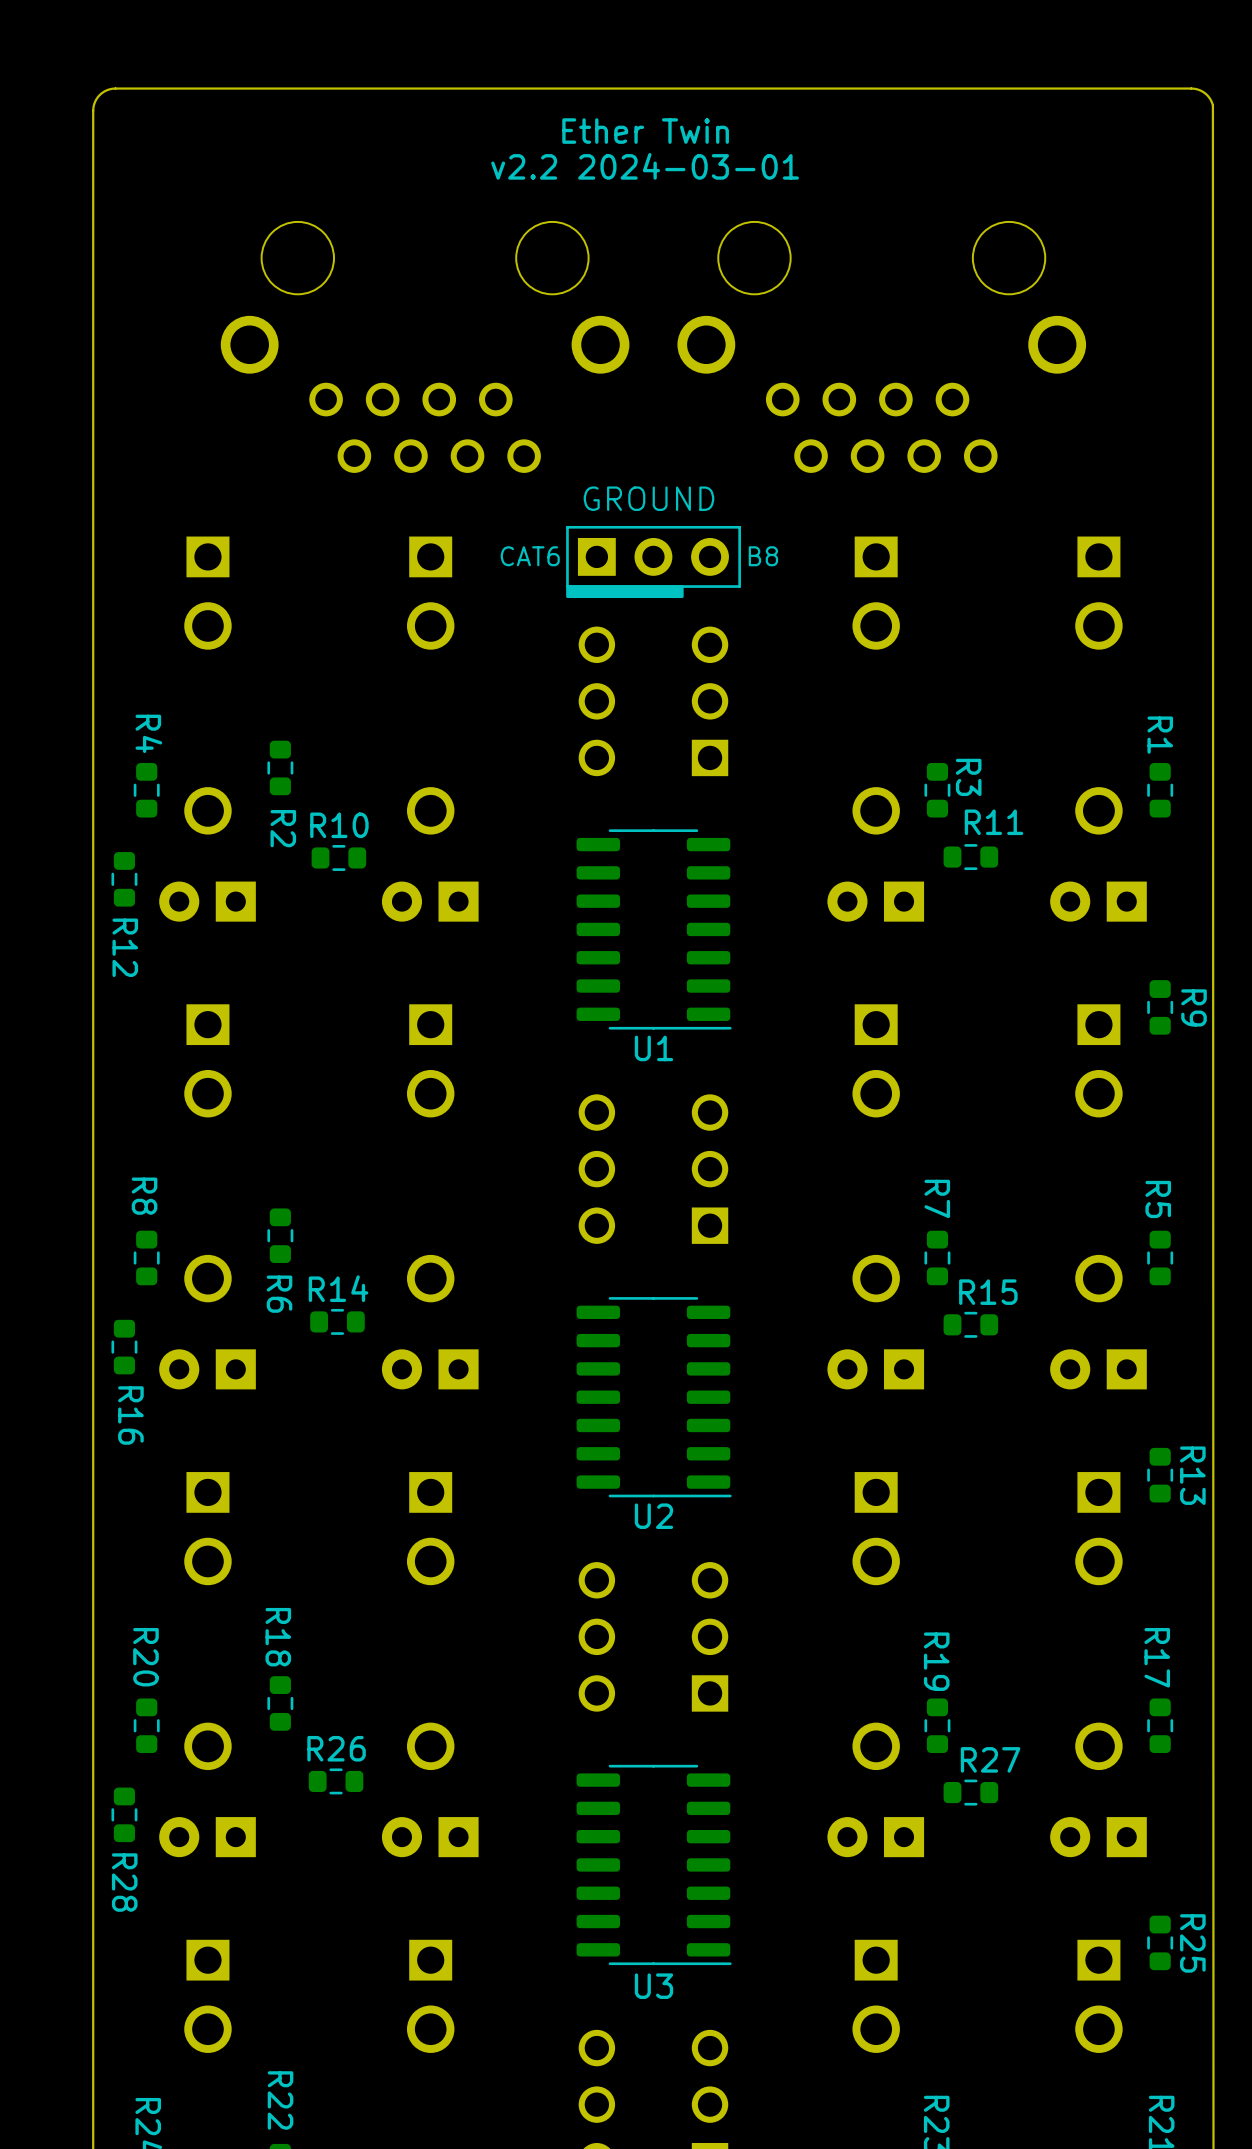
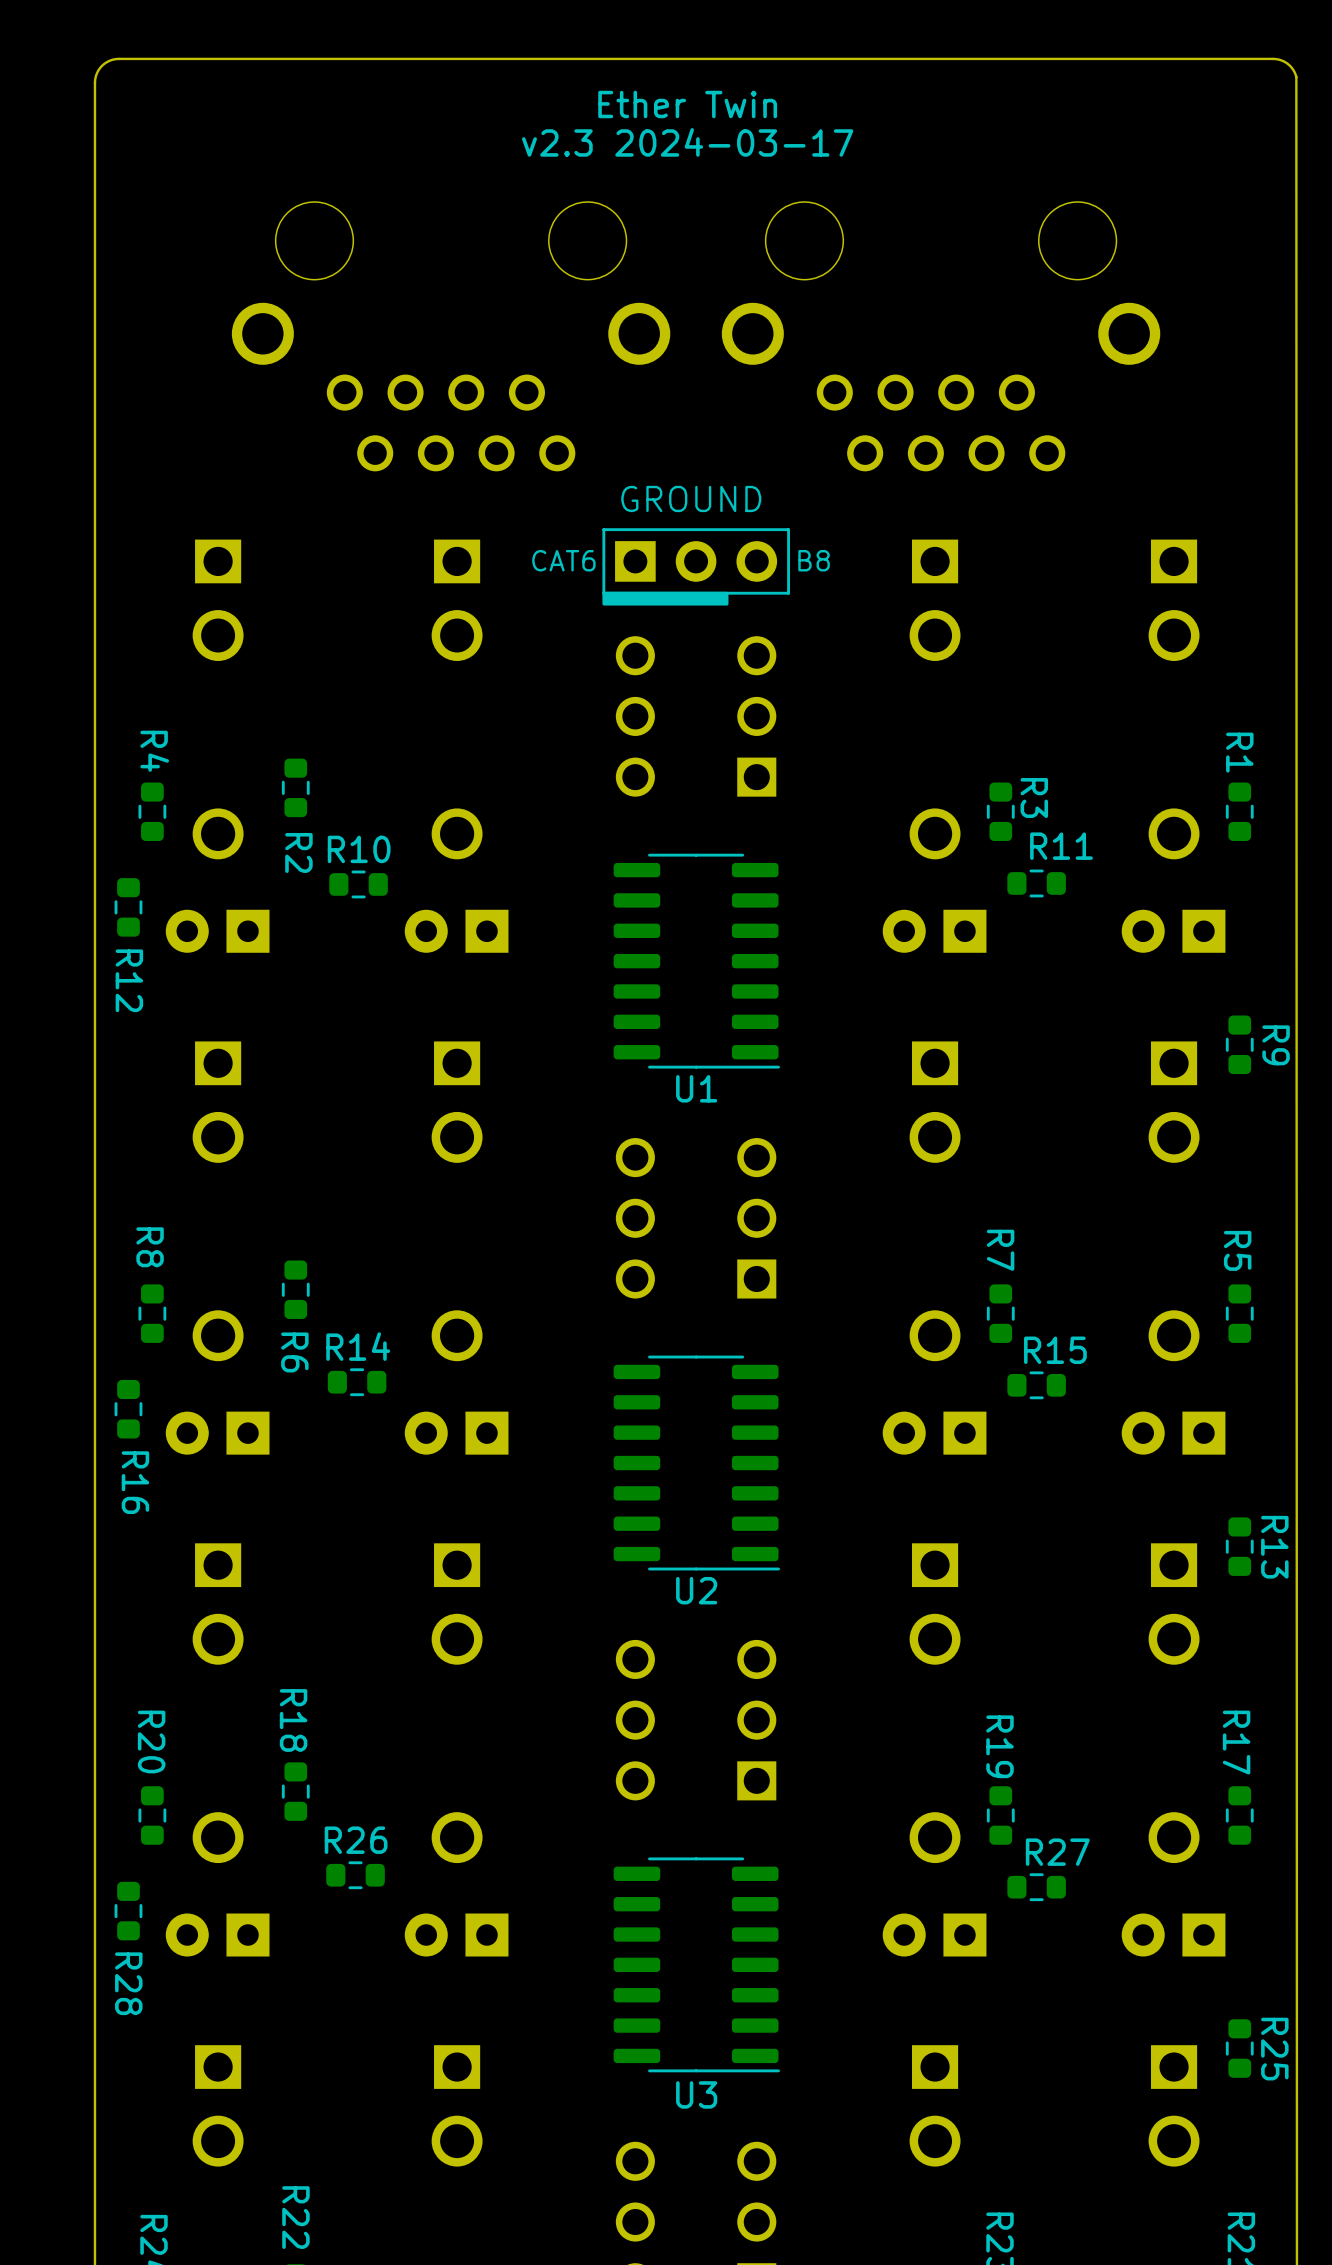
text: v2.2 2024-03-01 (645, 166) -> v2.3 2024-03-17 (687, 142)

